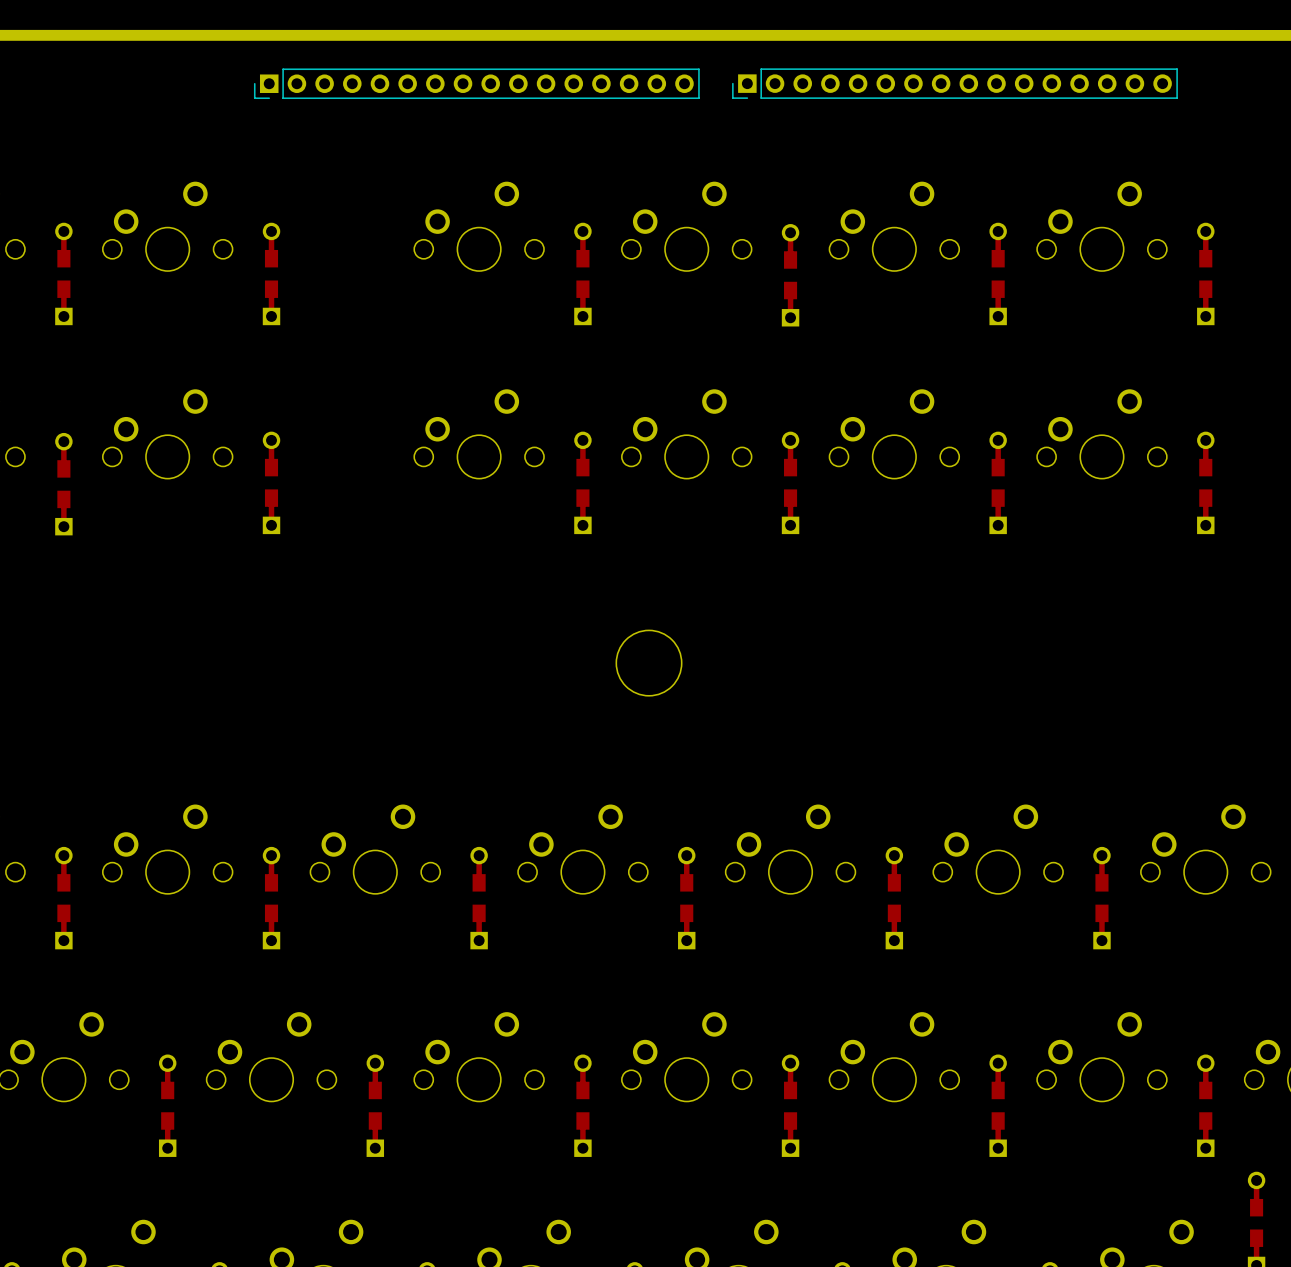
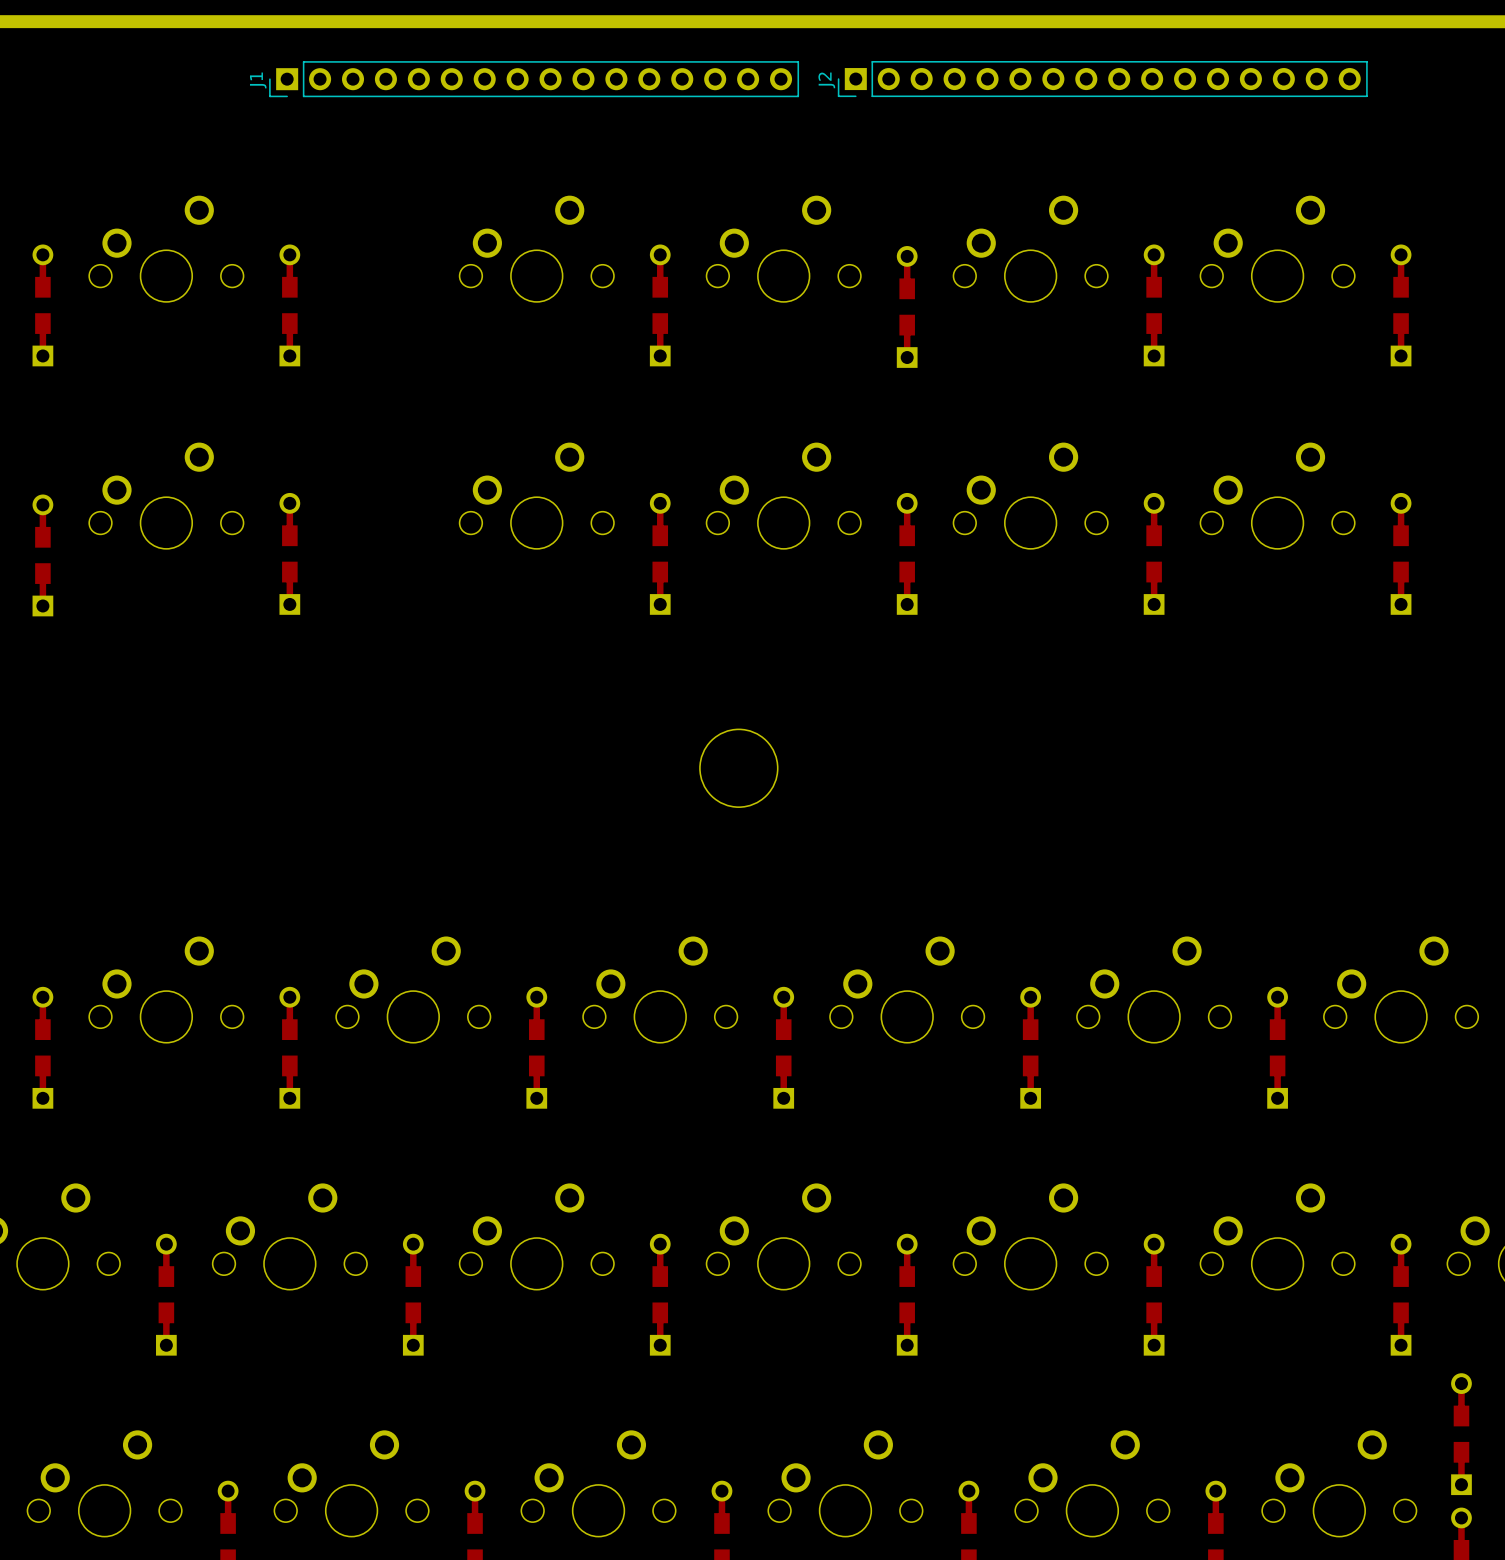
J1 name: none -> J1 (258, 80)
J2 name: none -> J2 (826, 80)

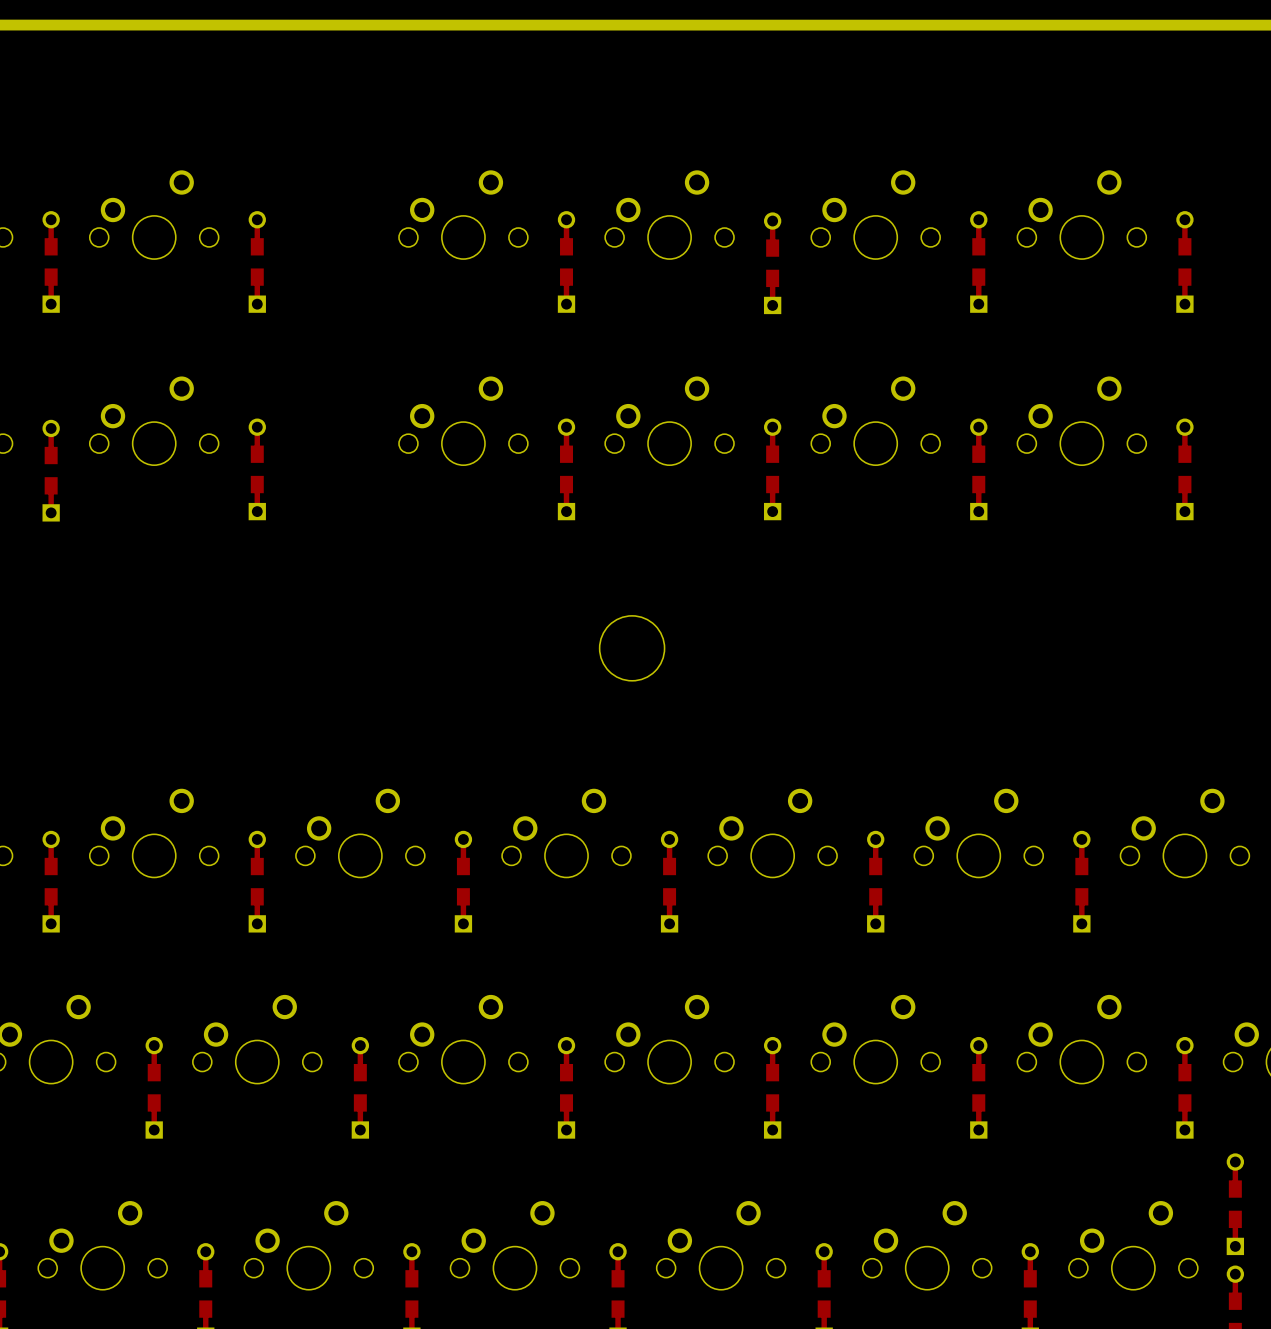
J1: (534, 79) -> none
J2: (1102, 79) -> none

